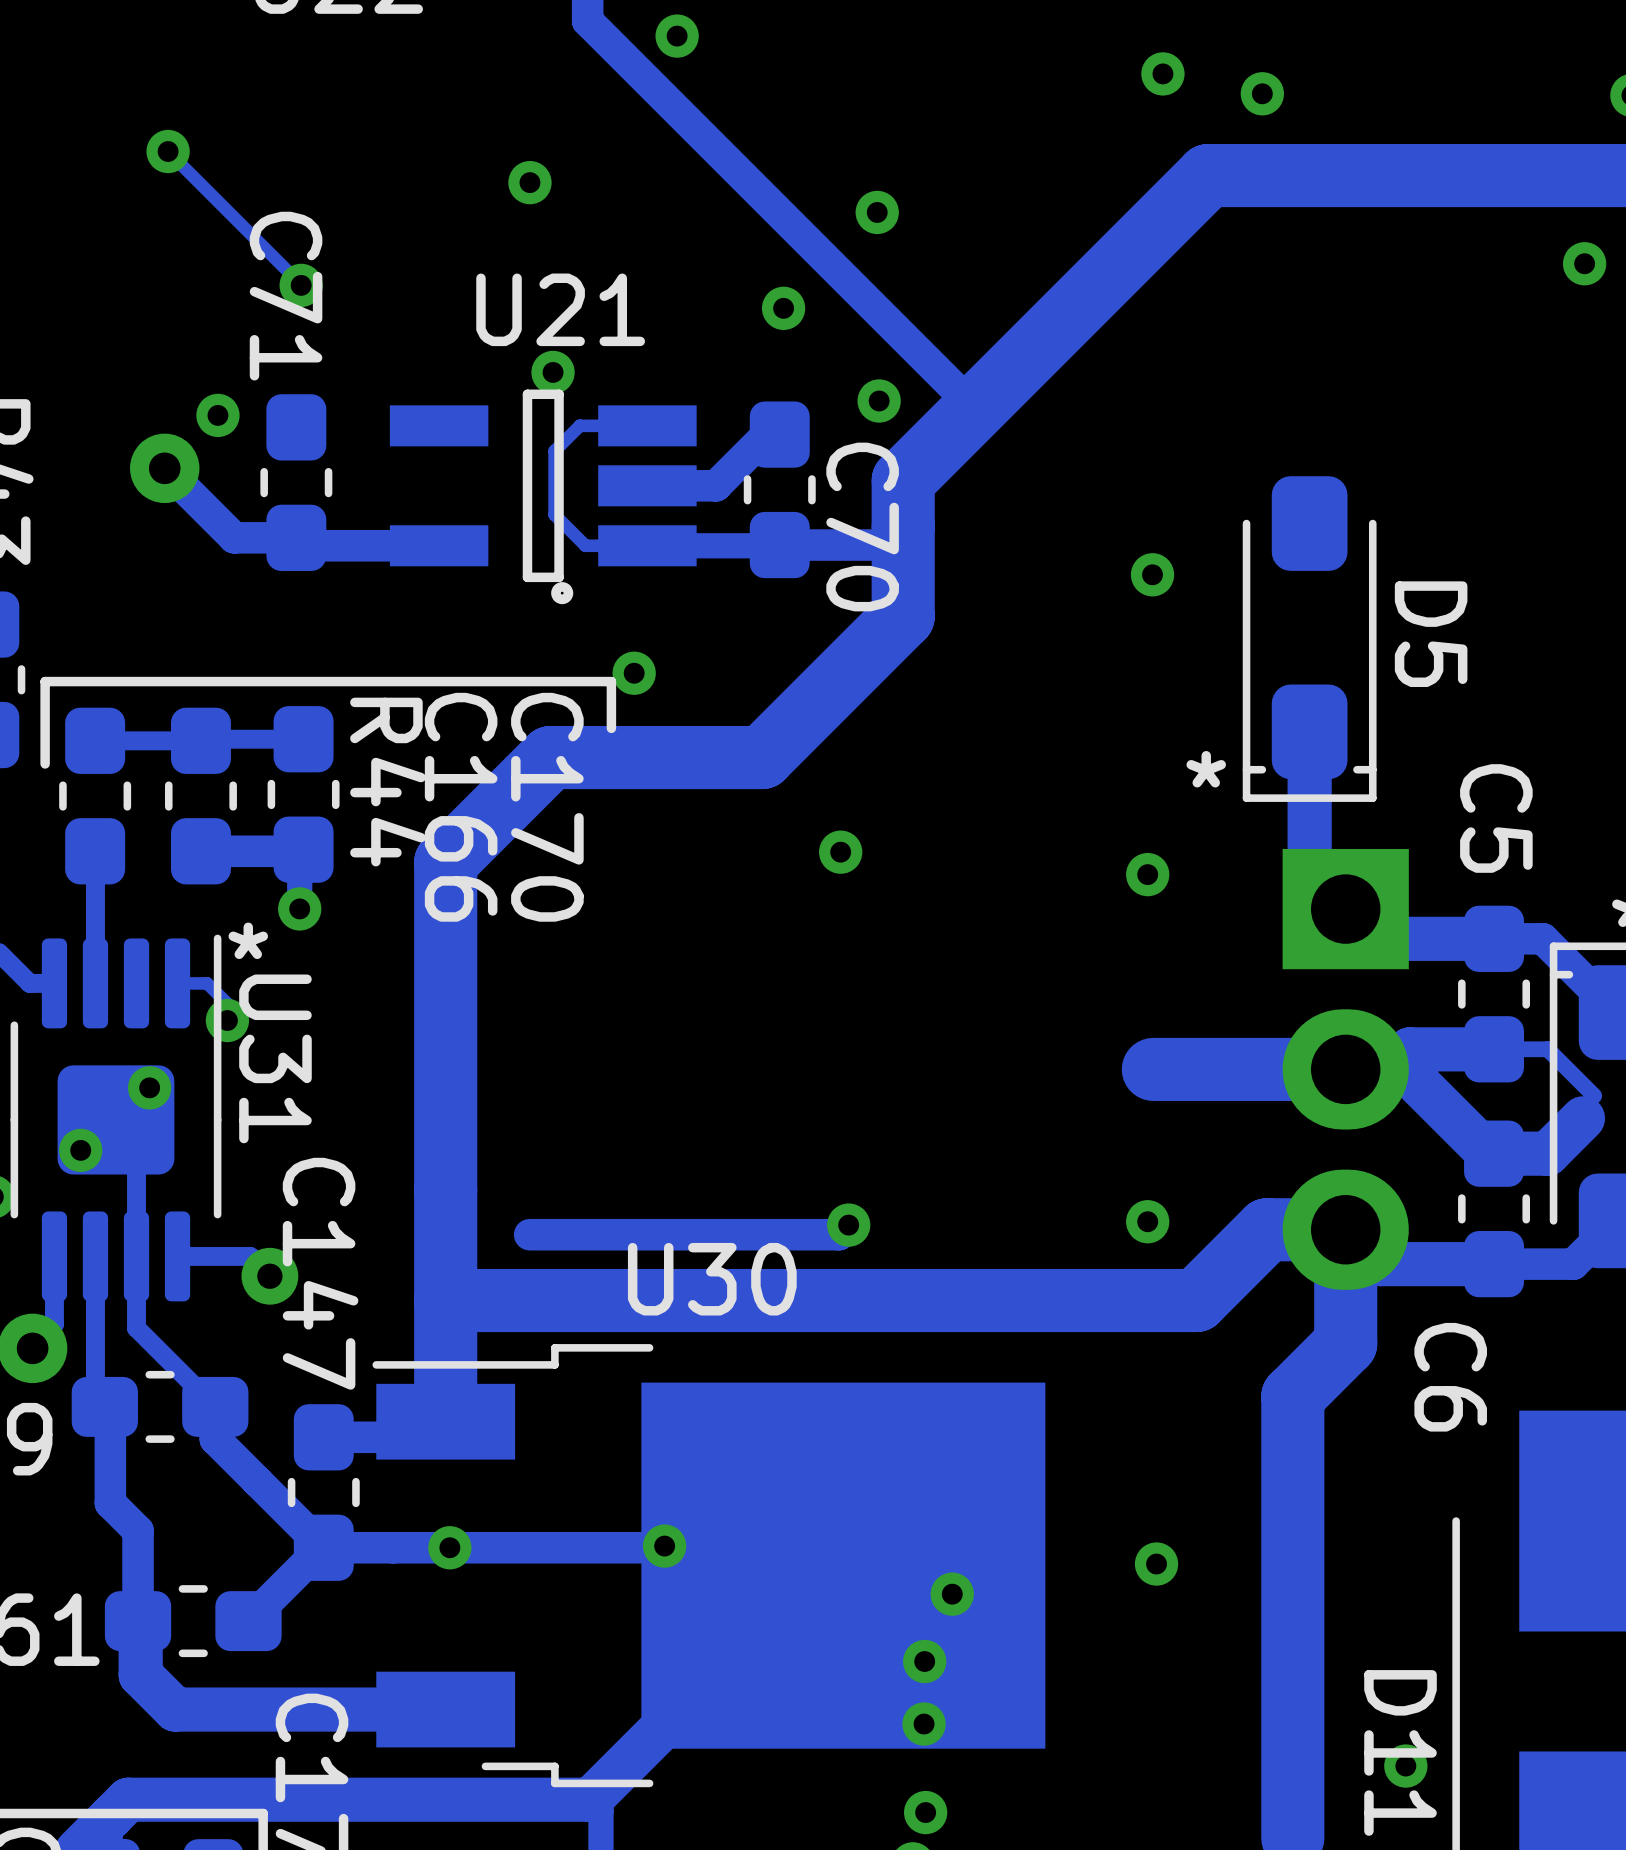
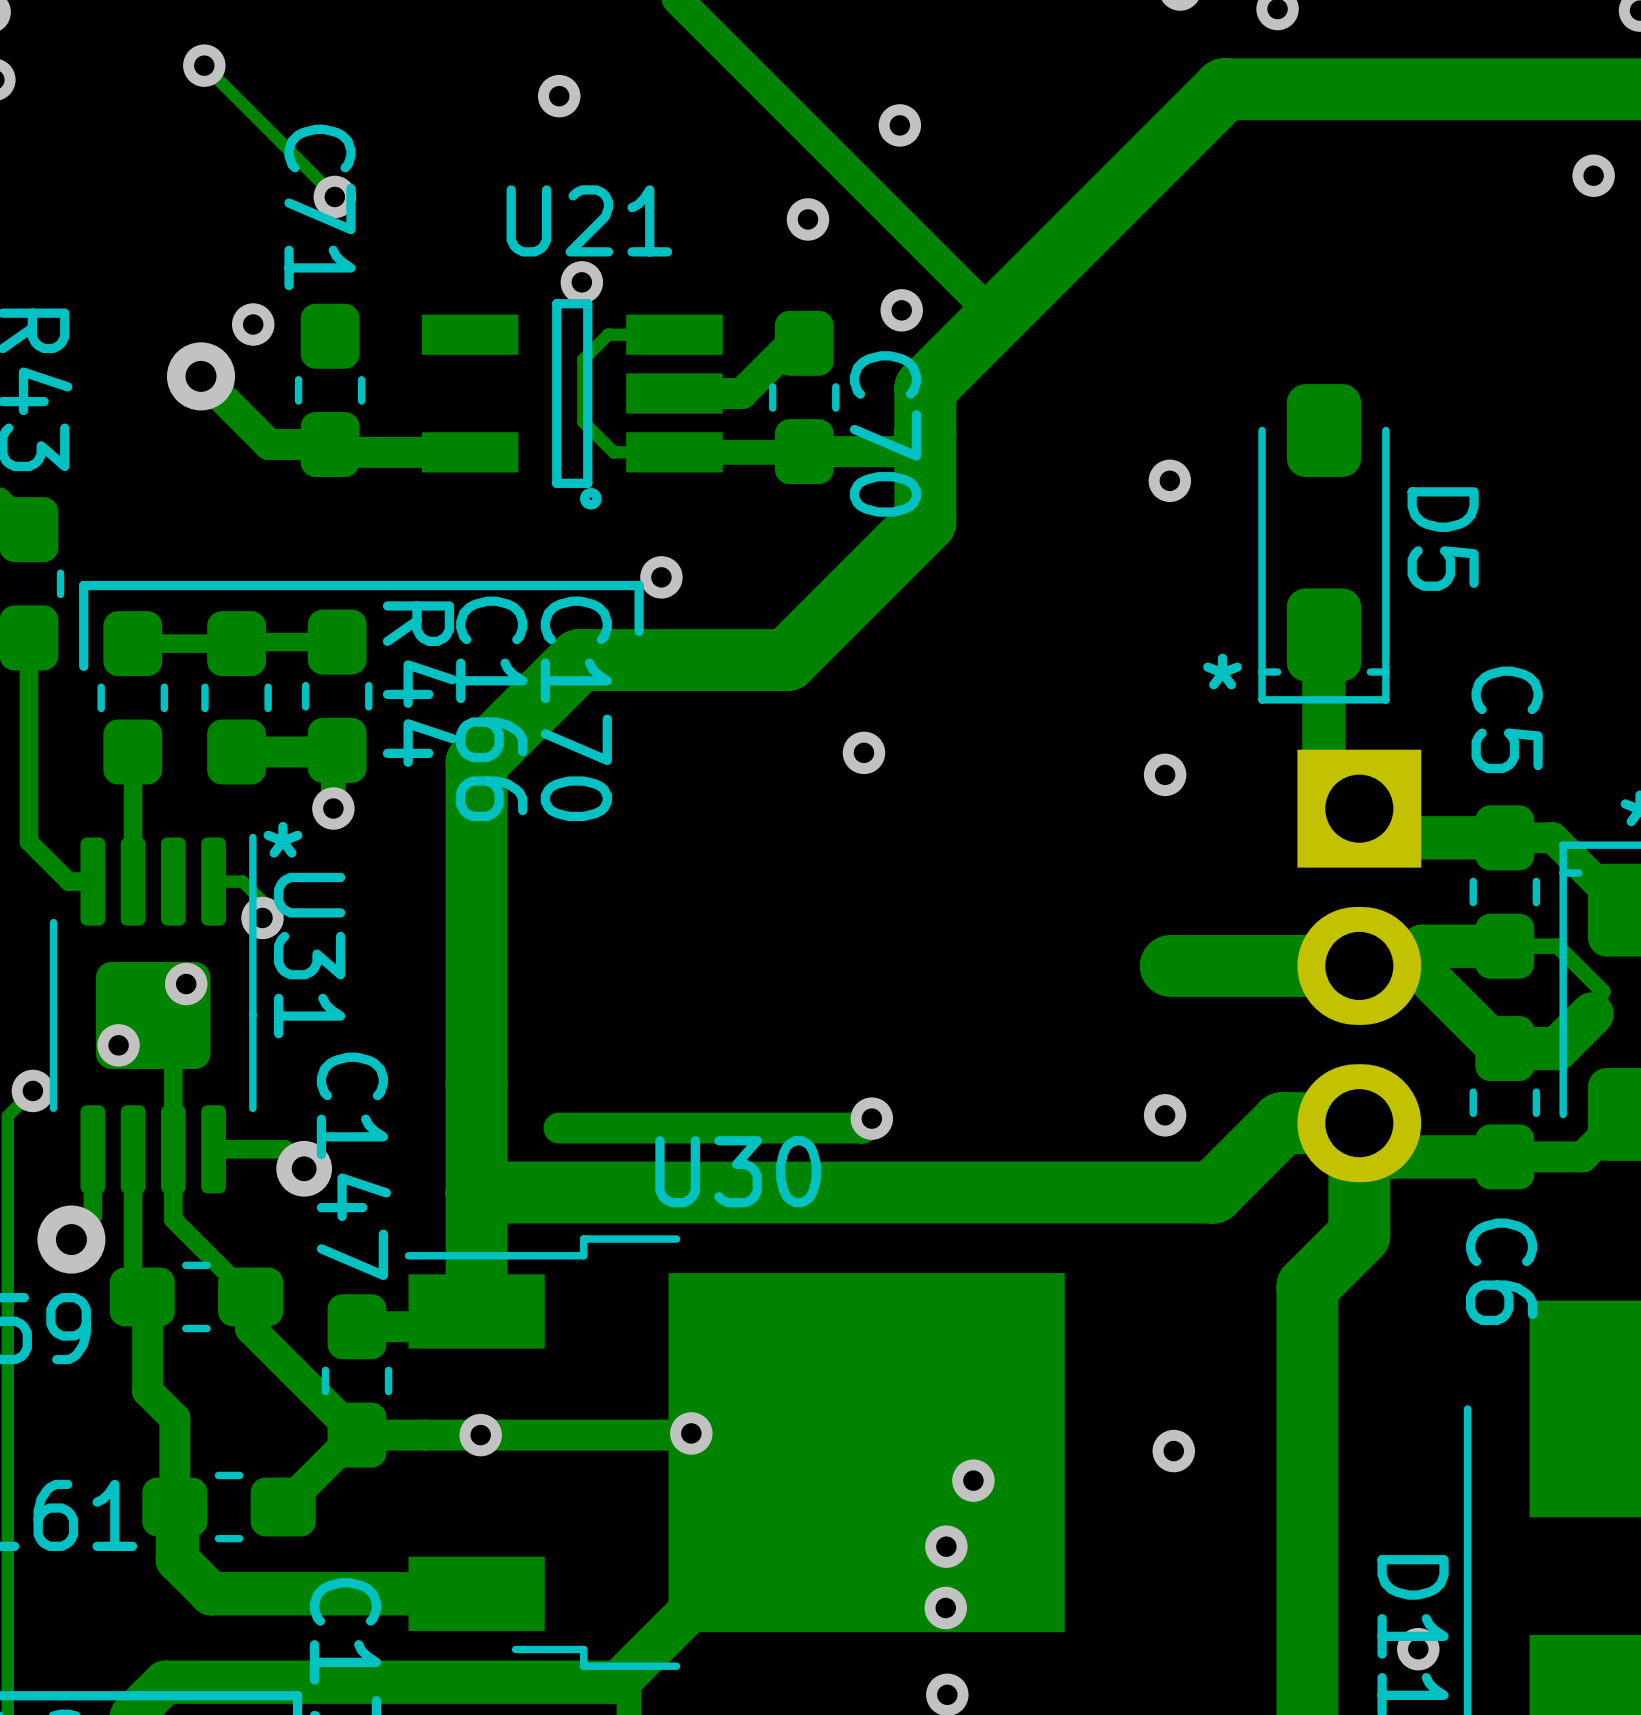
C6 name position: C6 (1450, 1377) -> C6 (1501, 1271)

